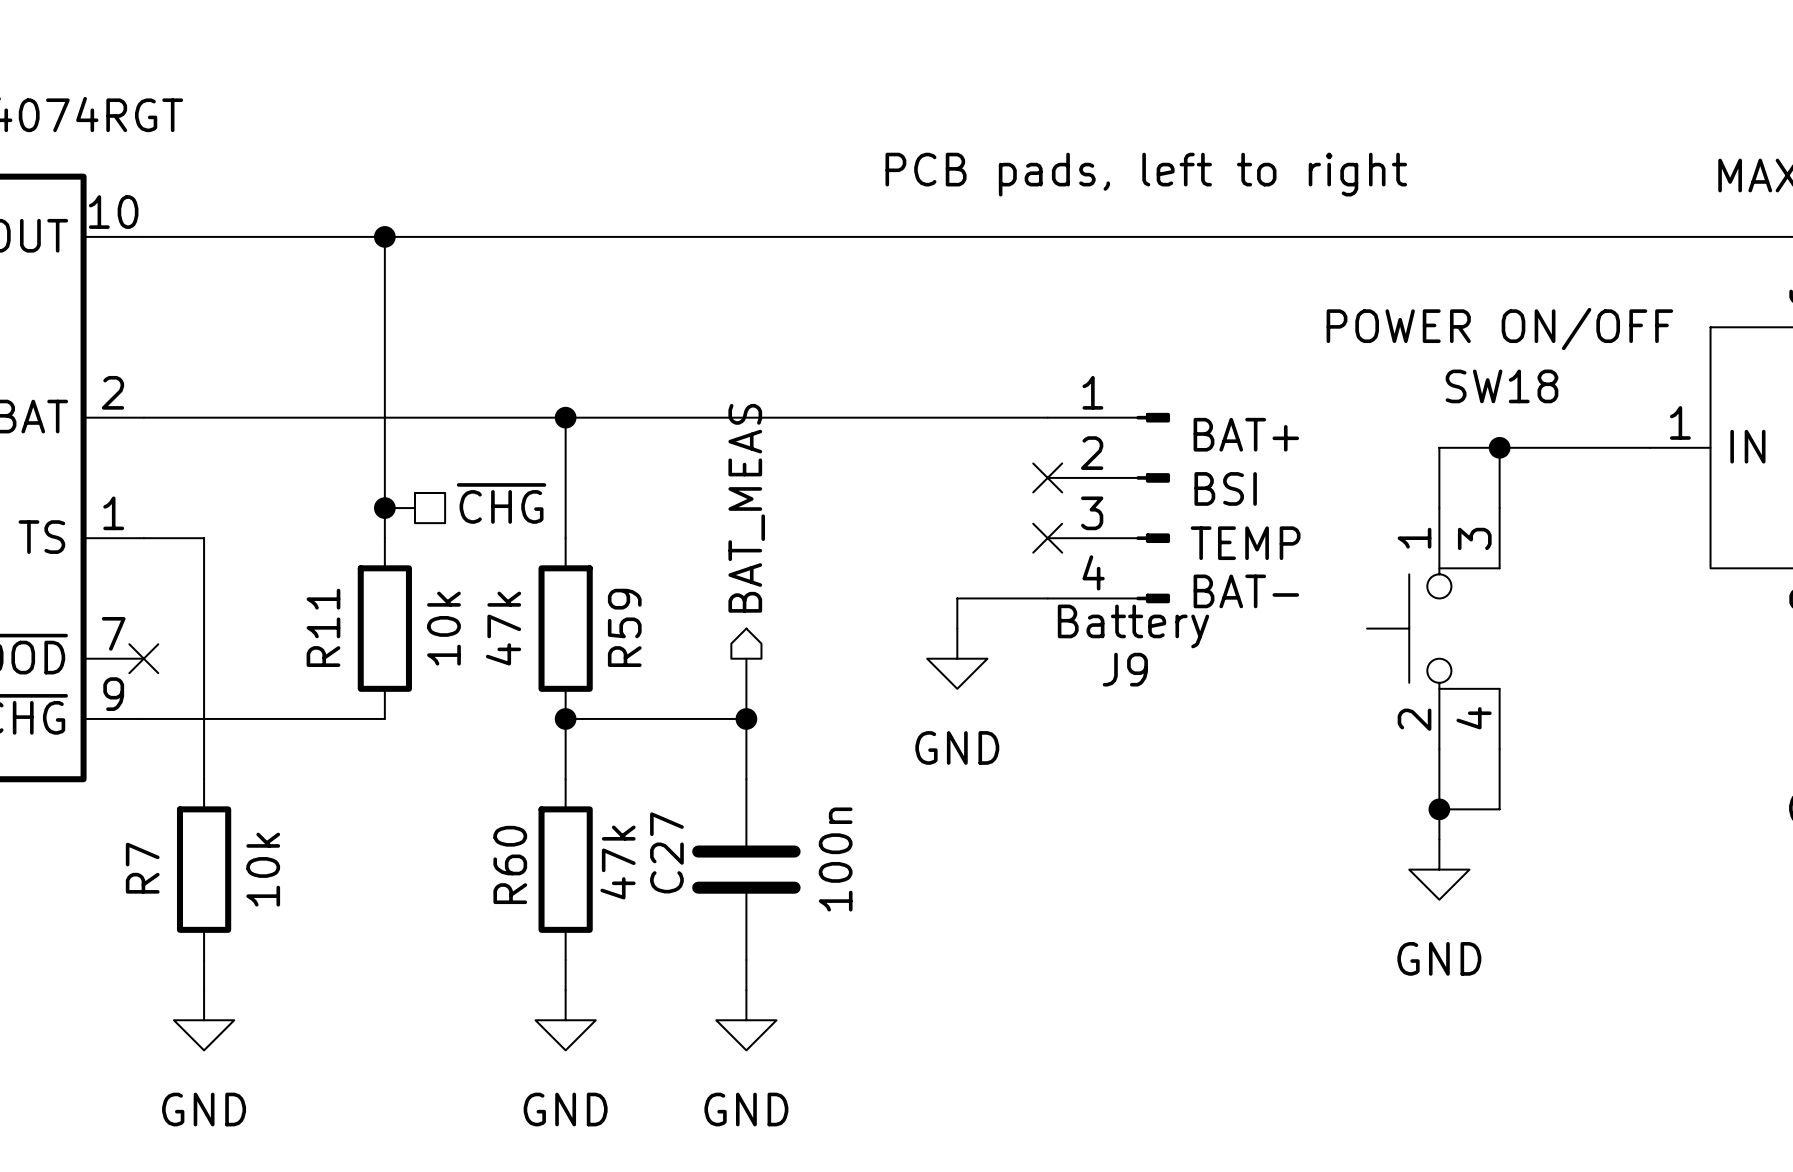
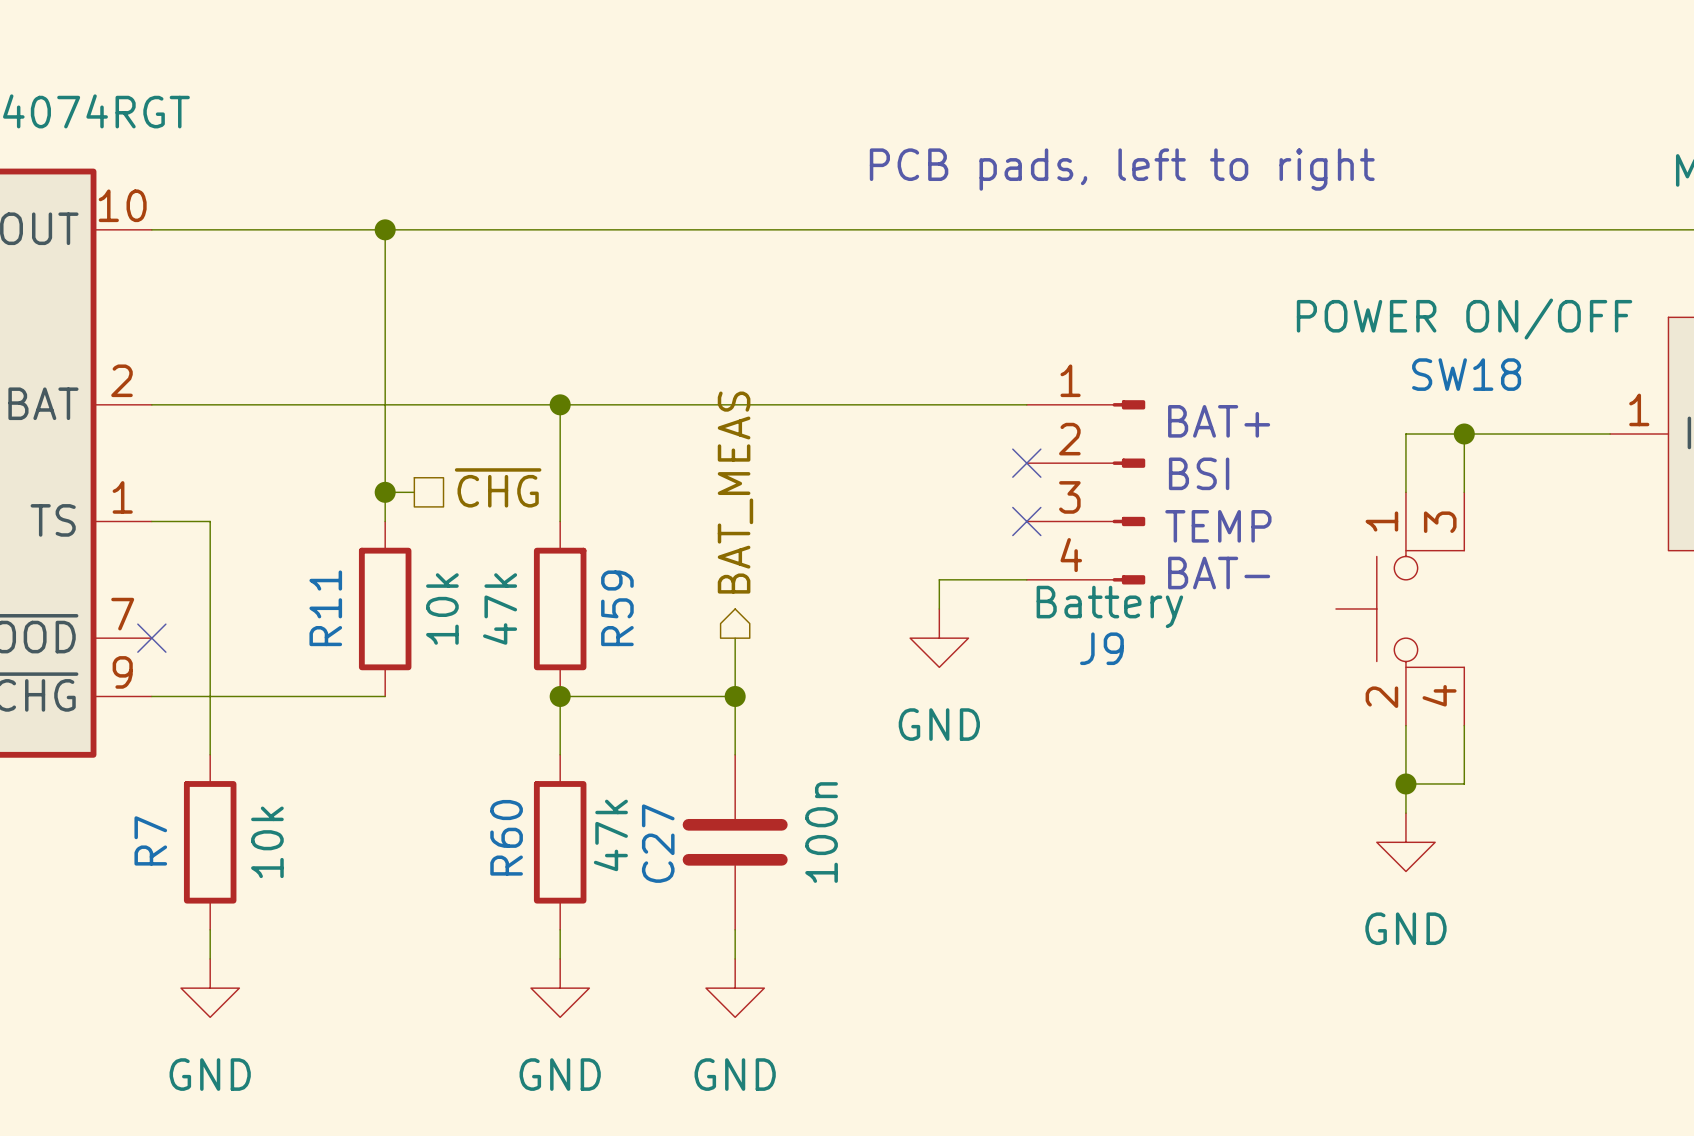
C27 name position: C27 (666, 852) -> C27 (658, 843)

